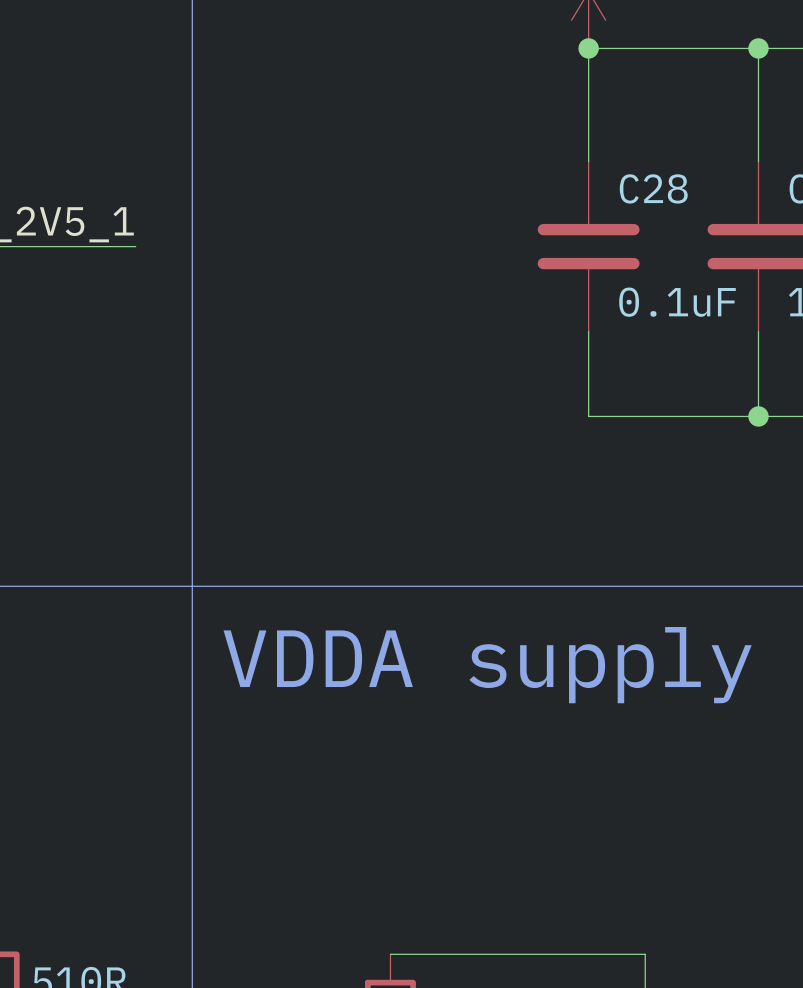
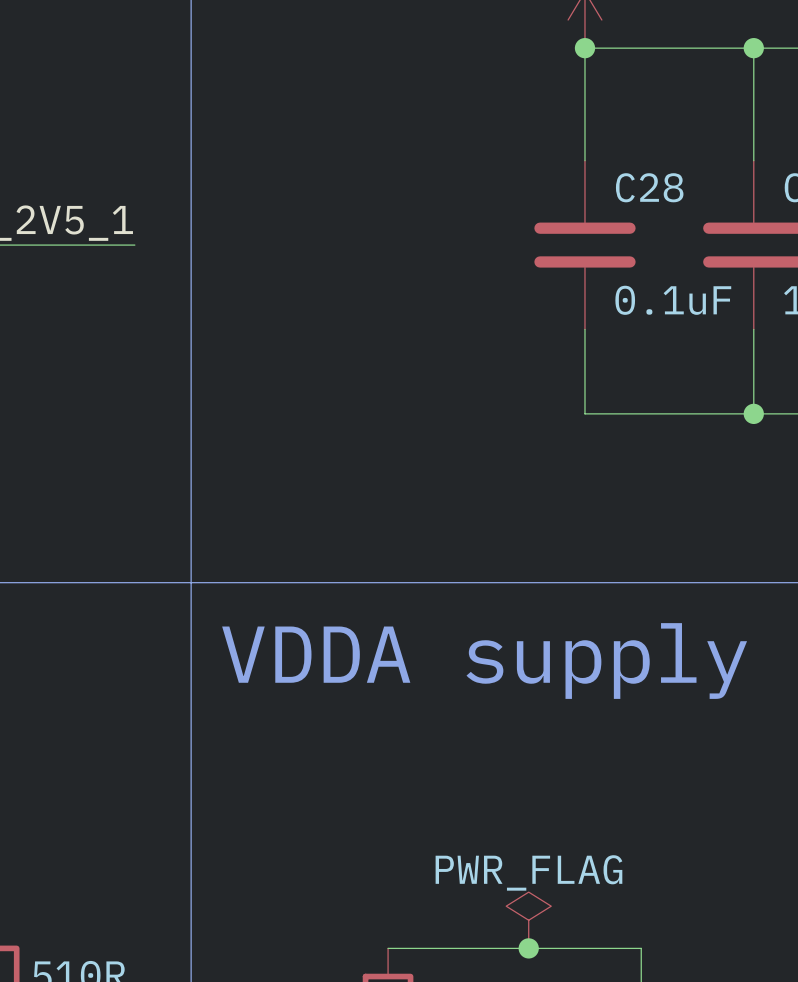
power symbol: none -> PWR_FLAG (528, 920)
junction: none -> (528, 948)

